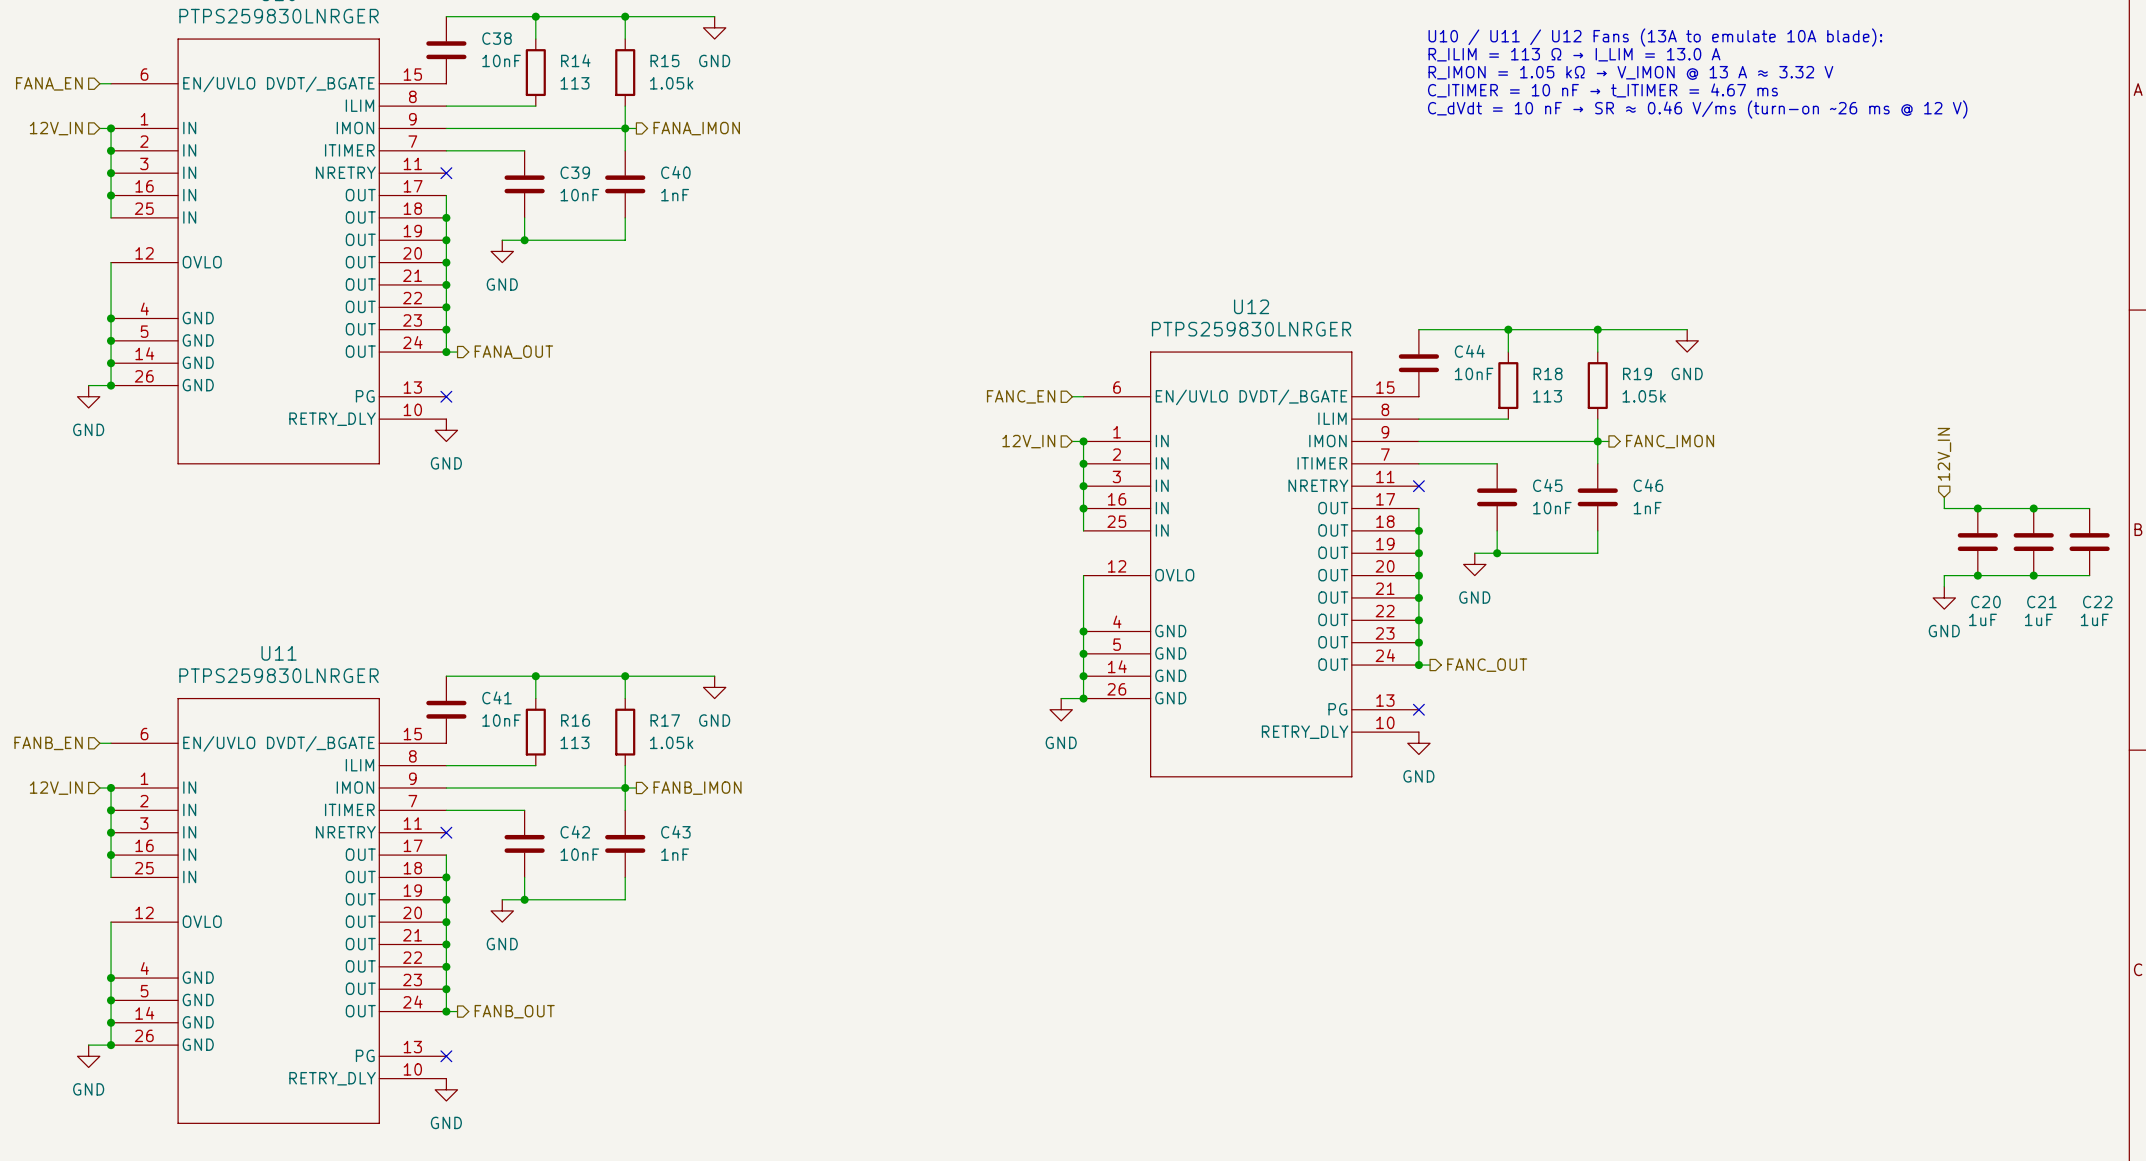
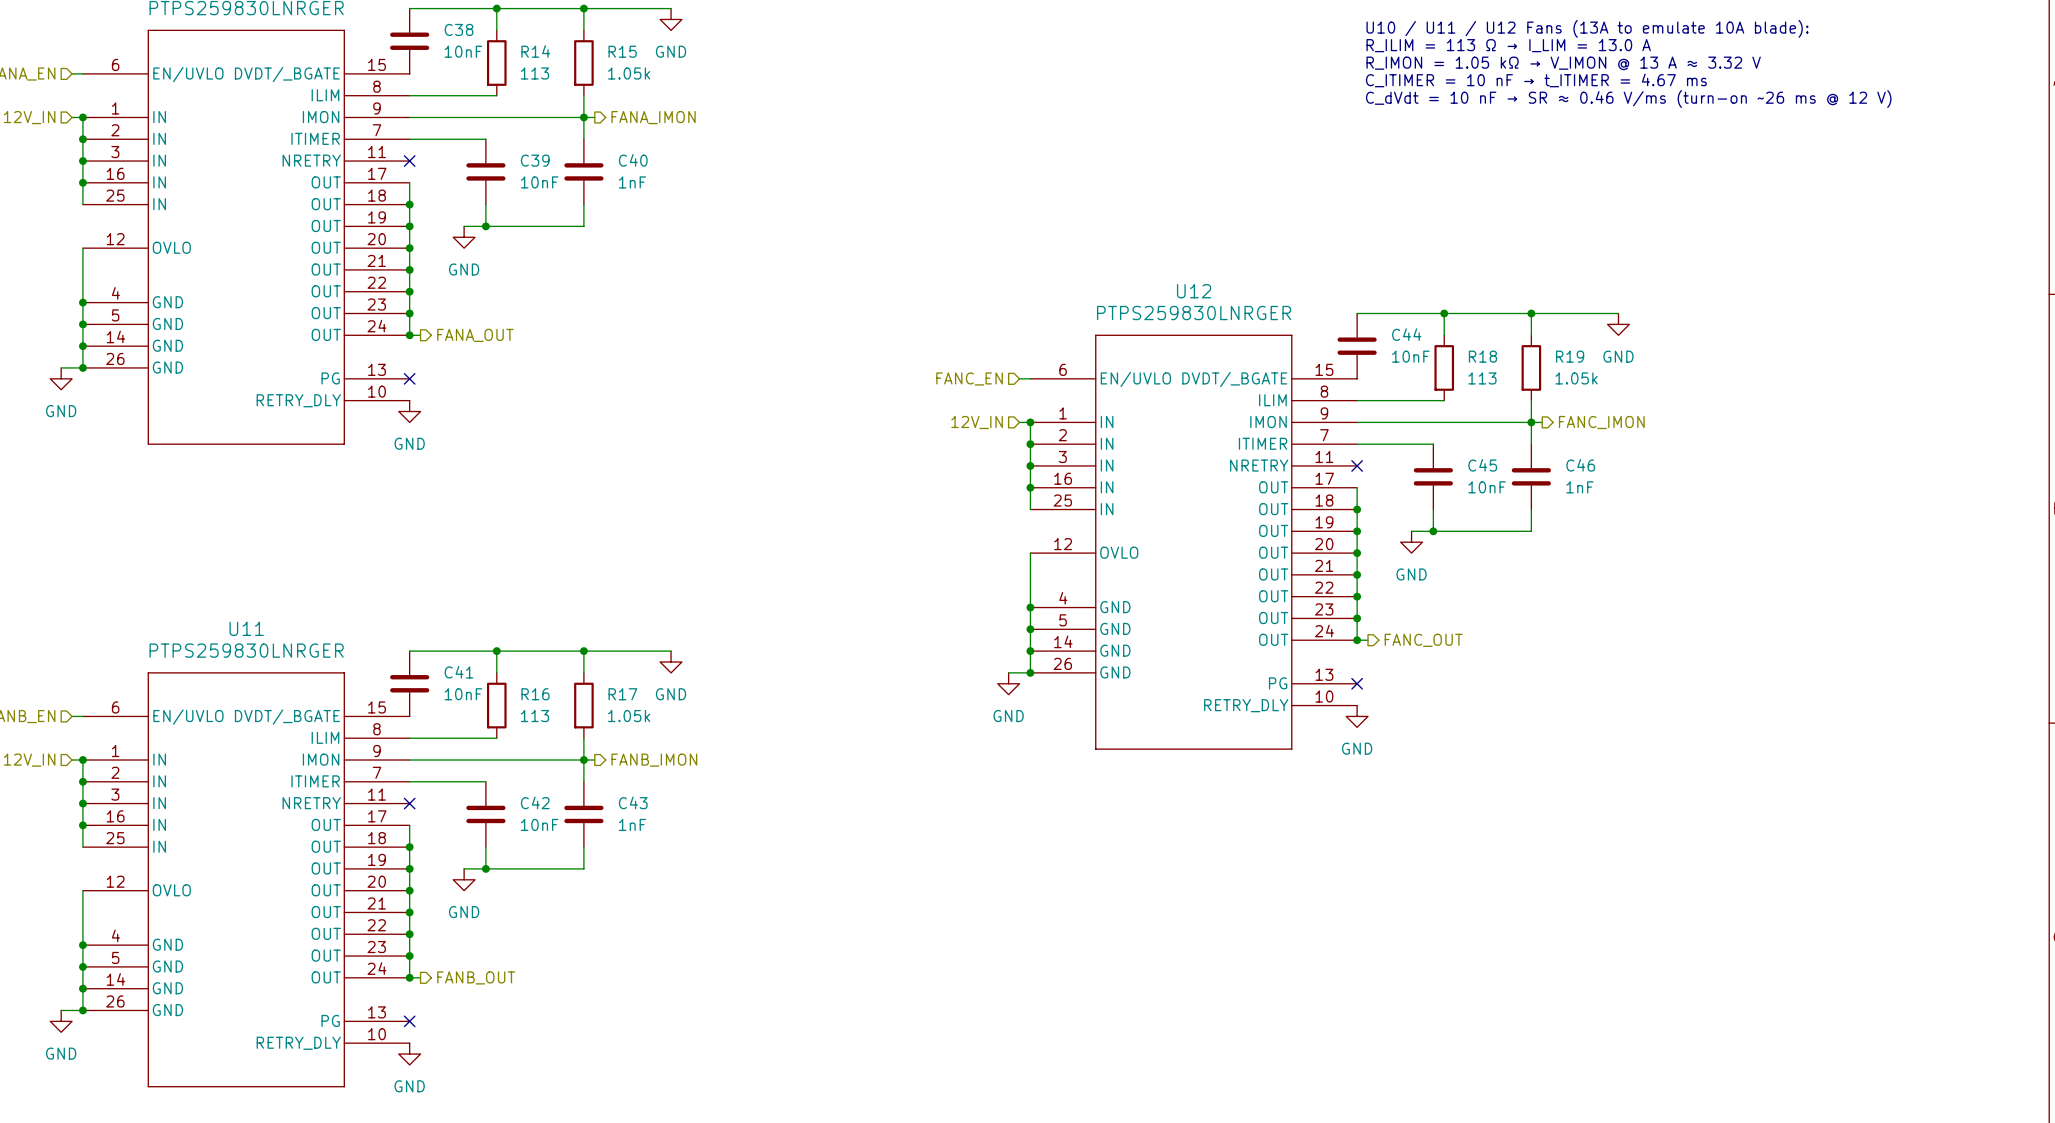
hierarchical label: 12V_IN (1944, 454) -> none
wire: (1944, 497) (1944, 508) (2089, 508) -> none
junction: (1977, 508) -> none
junction: (2033, 508) -> none
C20: 1uF (1977, 542) -> none
C21: 1uF (2033, 542) -> none
C22: 1uF (2089, 542) -> none
junction: (1977, 575) -> none
junction: (2033, 575) -> none
wire: (2089, 575) (1944, 575) (1944, 586) -> none
power symbol: GND (1944, 597) -> none

